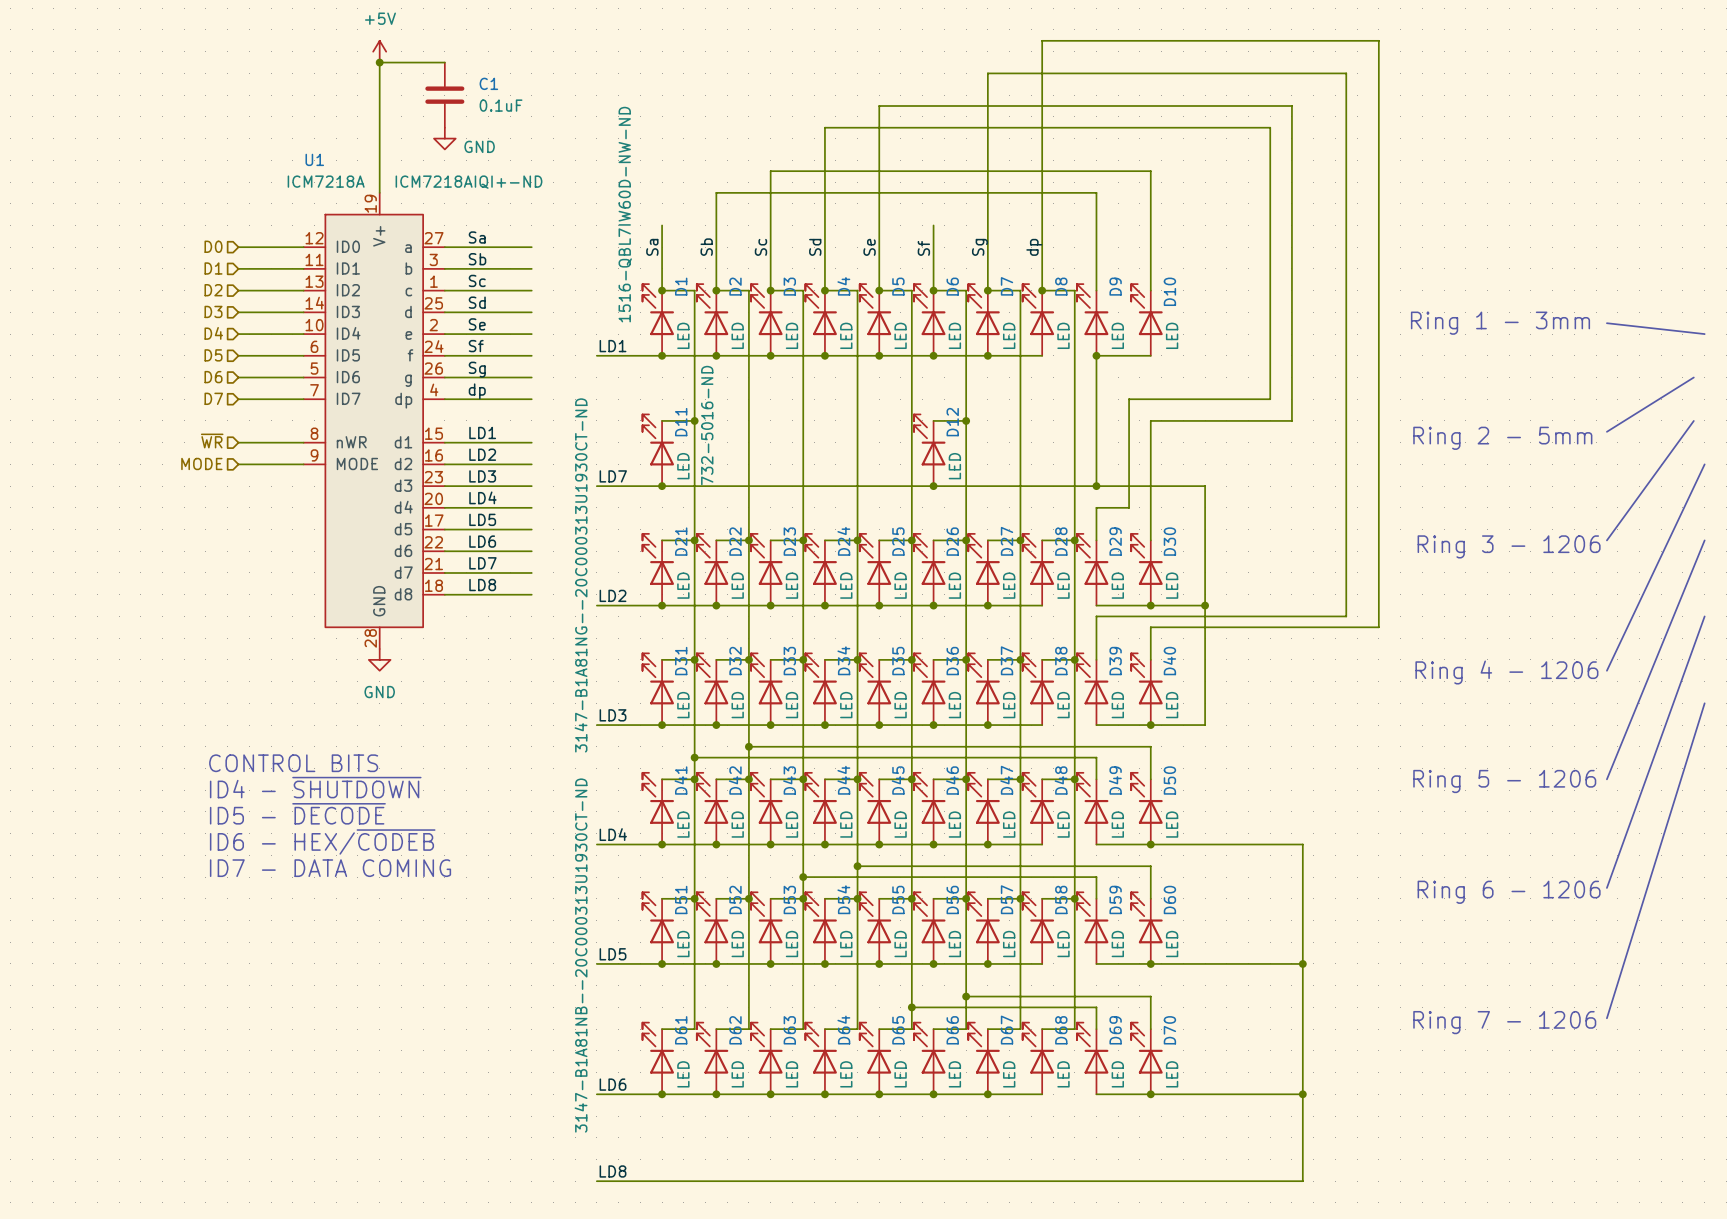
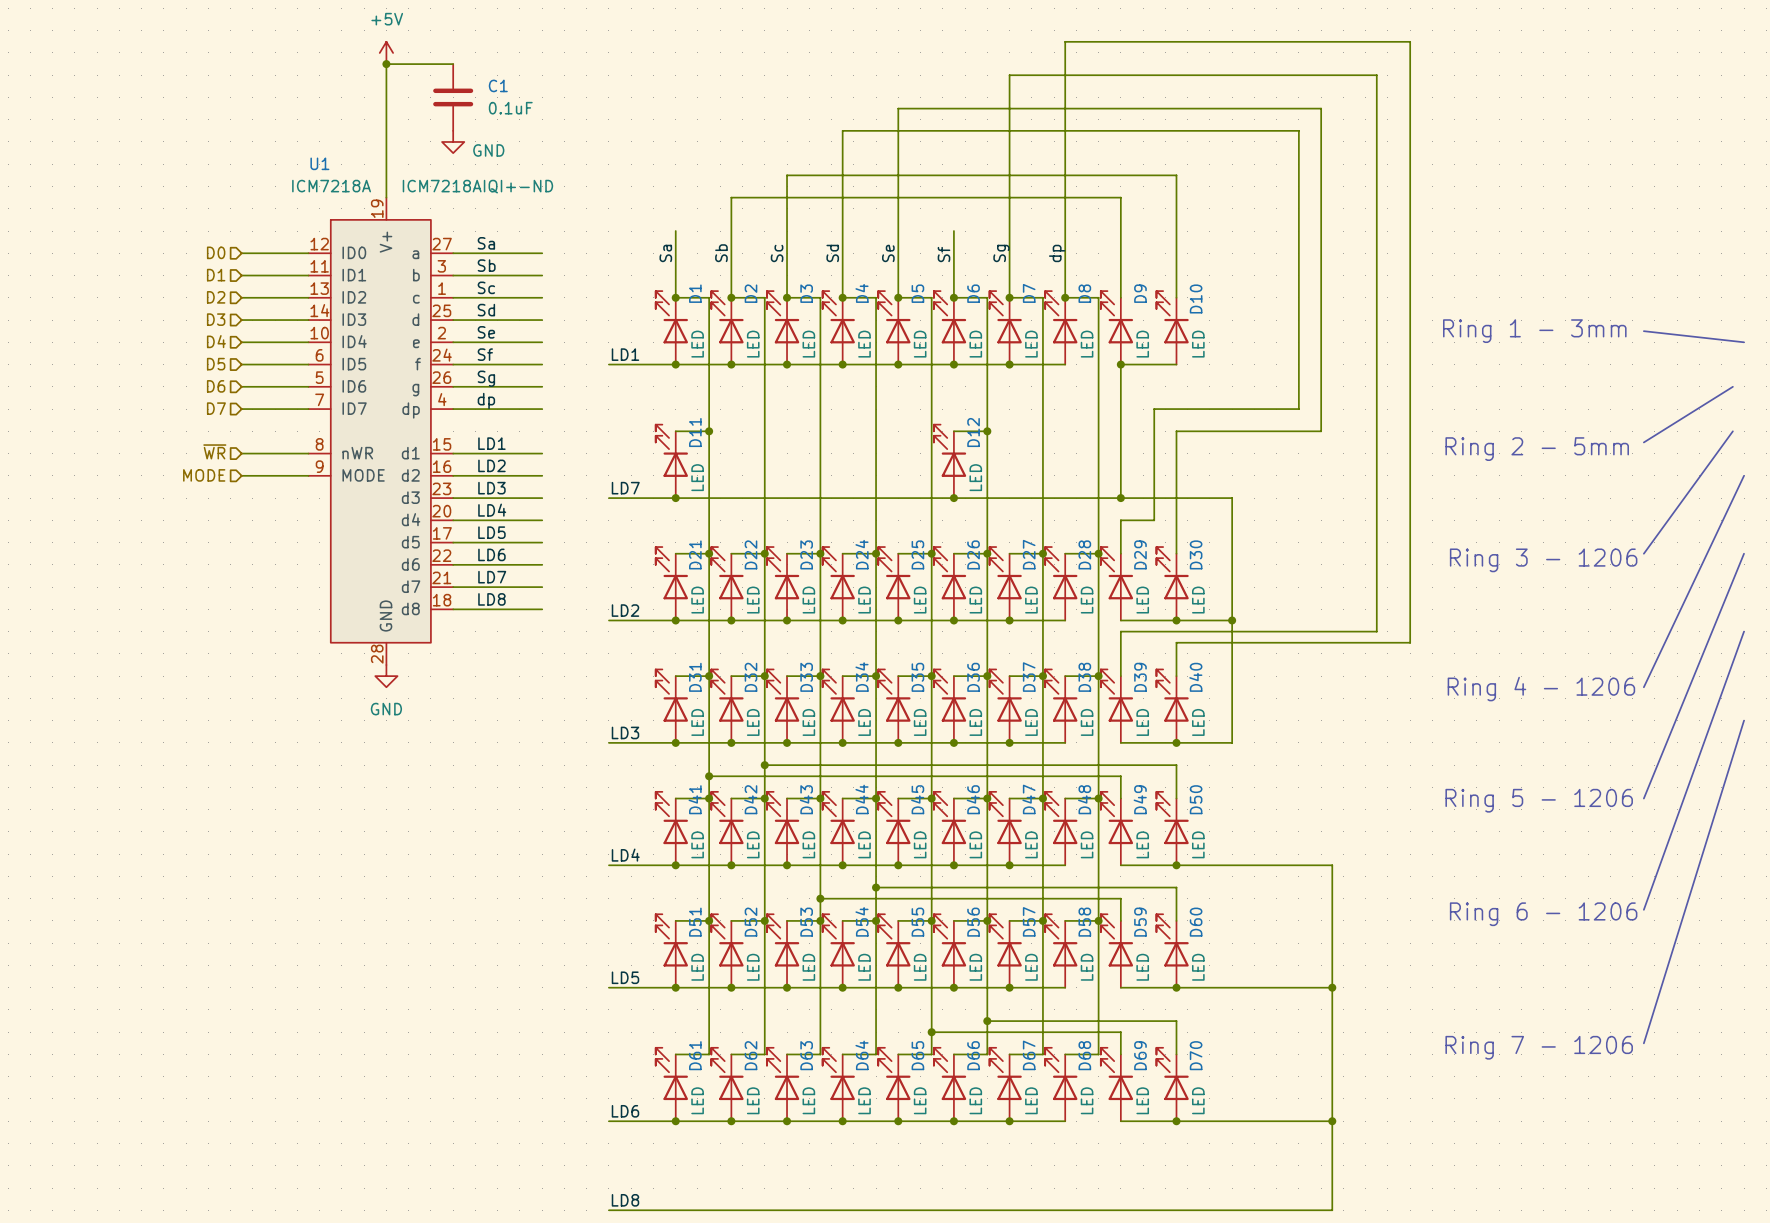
D1 text: 1516-QBL7IW60D-NW-ND (625, 214) -> none
D11 text: 732-5016-ND (707, 425) -> none
D21 text: 3147-B1A81NG--20C000313U1930CT-ND (581, 575) -> none
text: CONTROL BITS (293, 763) -> none
text: ID4 - ~{SHUTDOWN} (315, 787) -> none
text: ID5 - ~{DECODE} (297, 813) -> none
text: ID6 - HEX/~{CODEB} (322, 841) -> none
text: ID7 - DATA COMING (330, 868) -> none
D41 text: 3147-B1A81NB--20C000313U1930CT-ND (581, 955) -> none

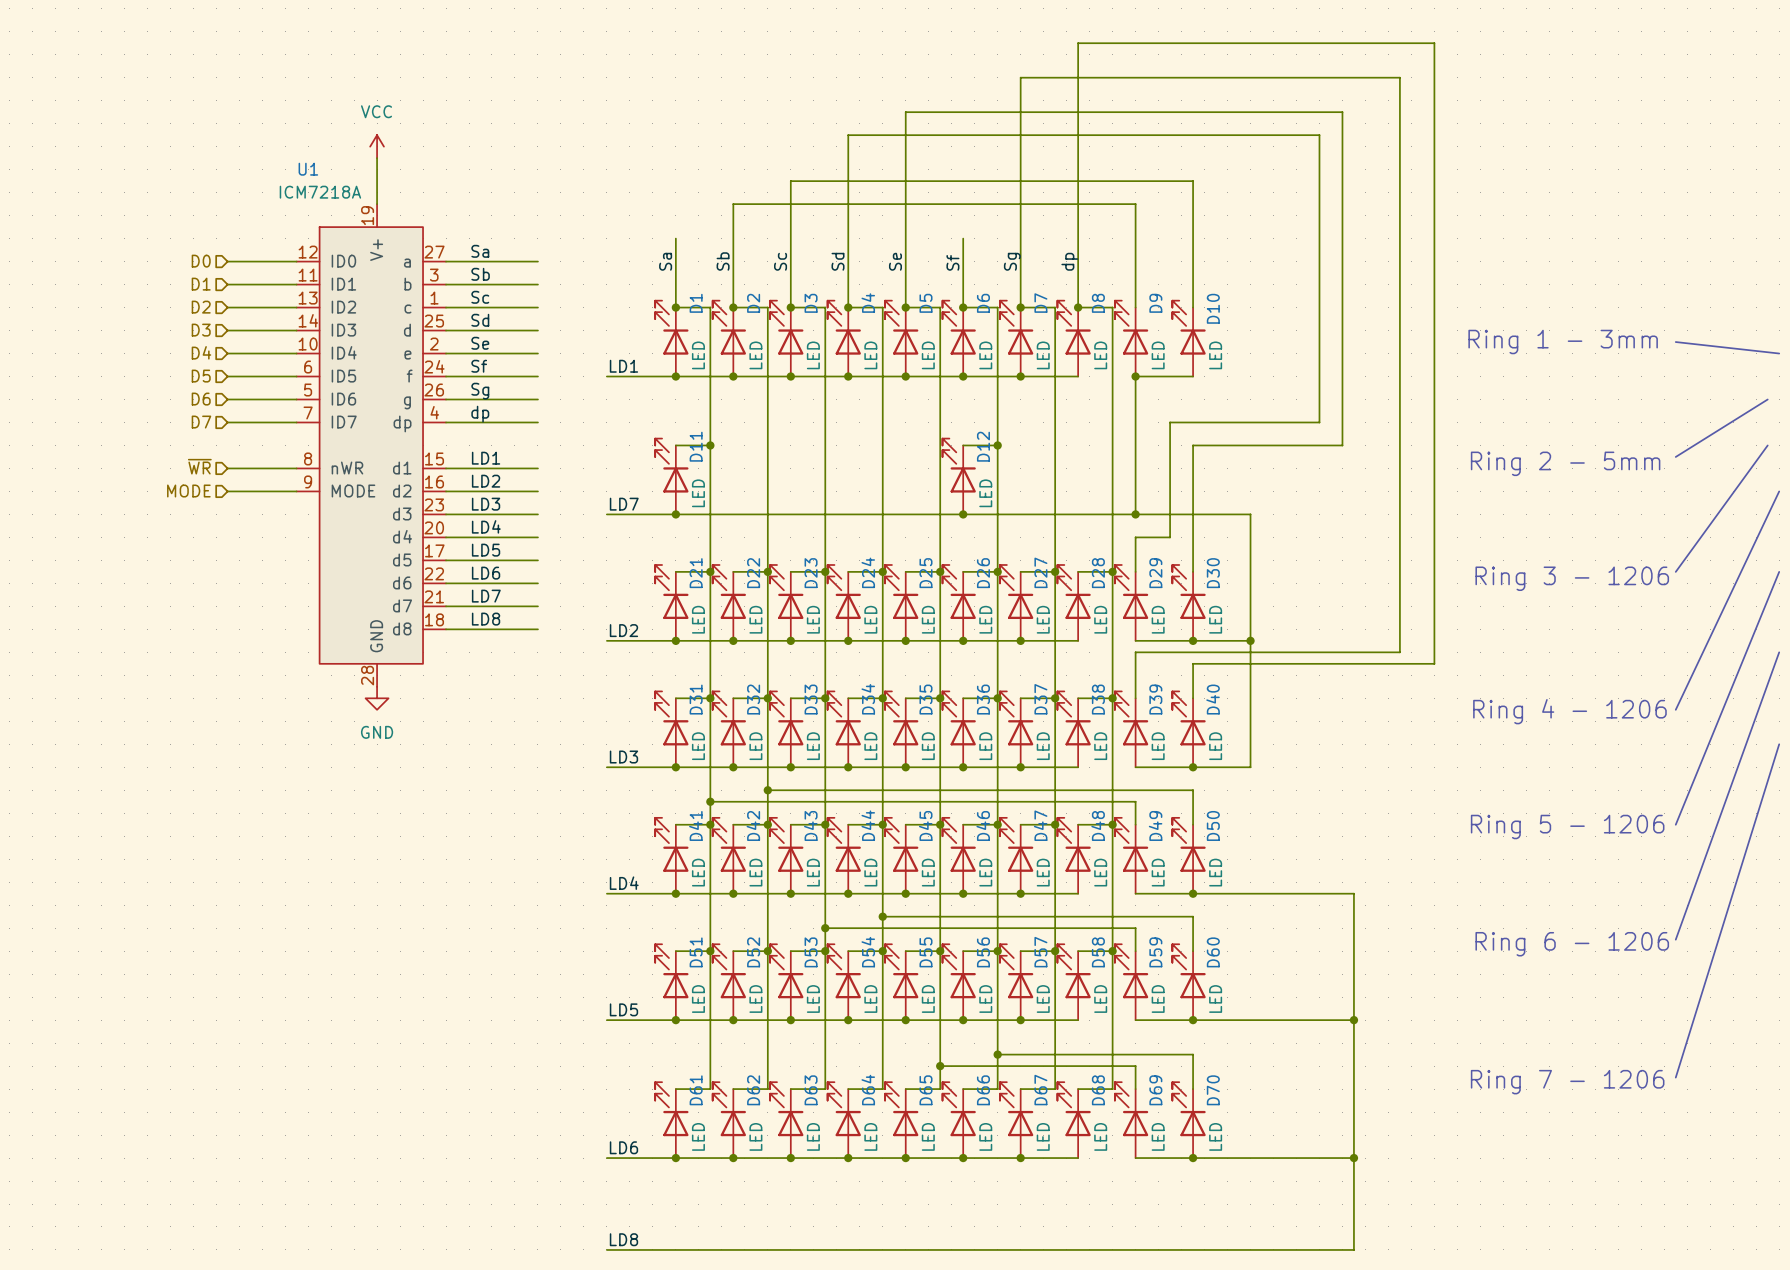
power symbol: +5V (386, 52) -> none
junction: (386, 64) -> none
wire: (453, 64) (386, 64) (386, 153) -> none
C1: 0.1uF (453, 97) -> none
power symbol: none -> VCC (377, 146)
power symbol: GND (453, 141) -> none
U1 text: ICM7218AIQI+-ND (477, 186) -> none

